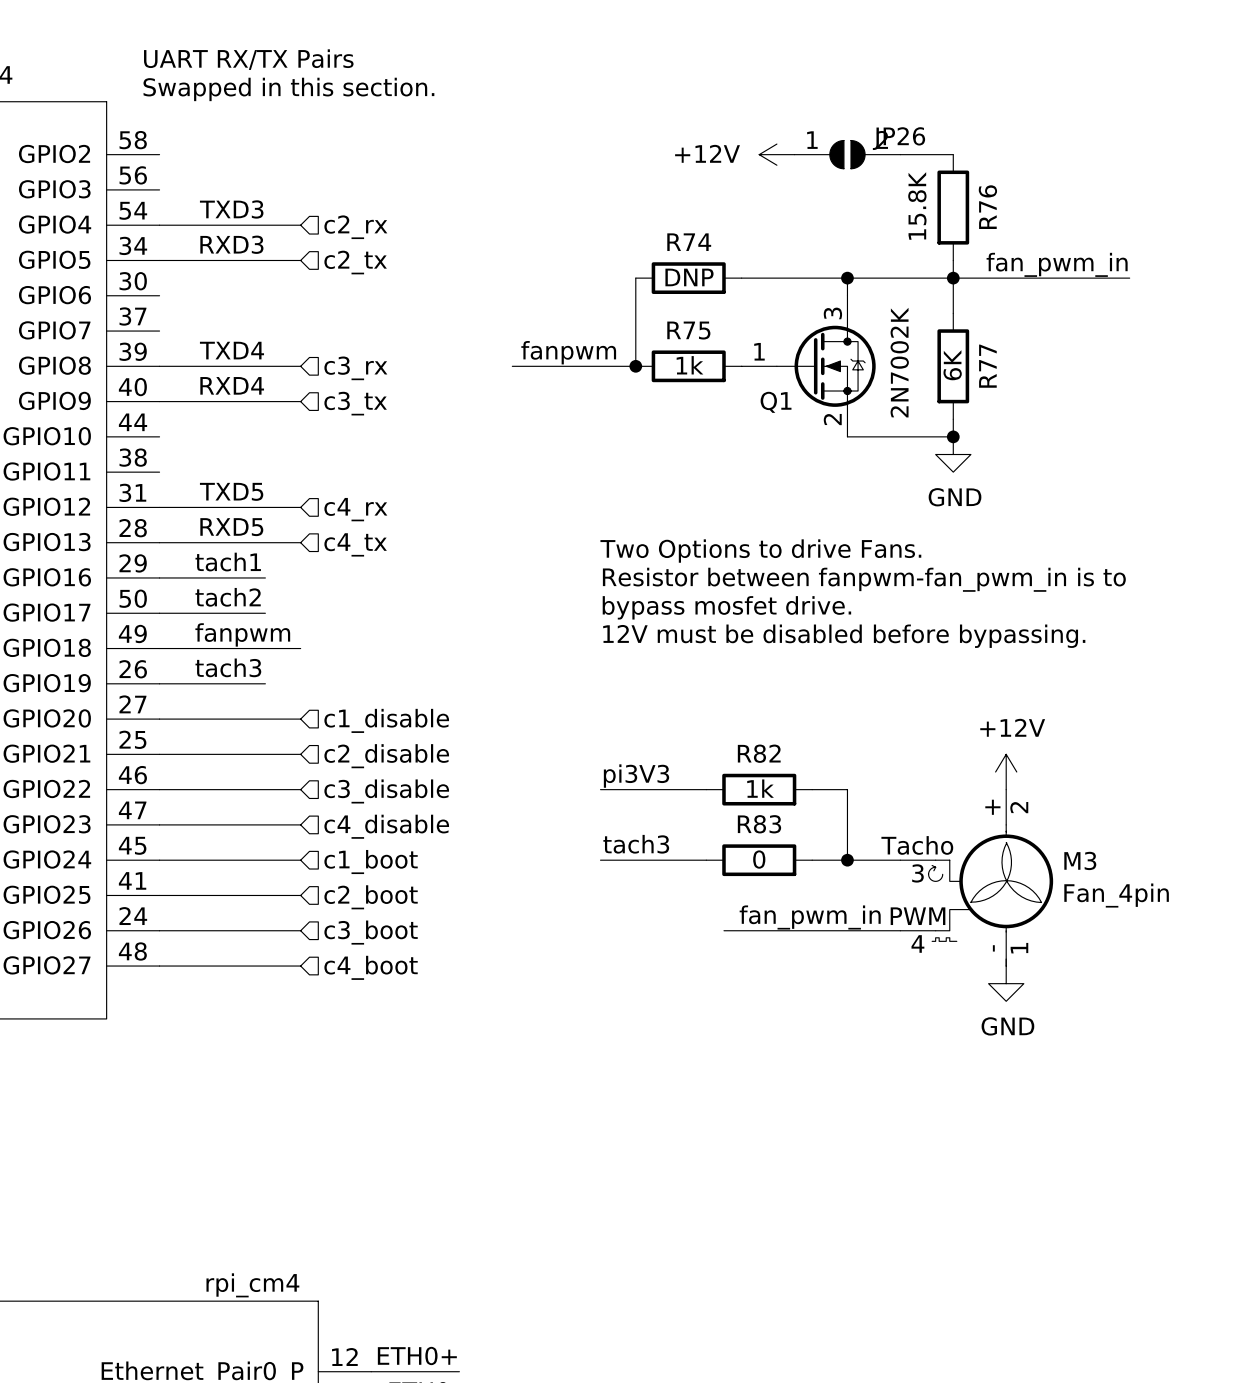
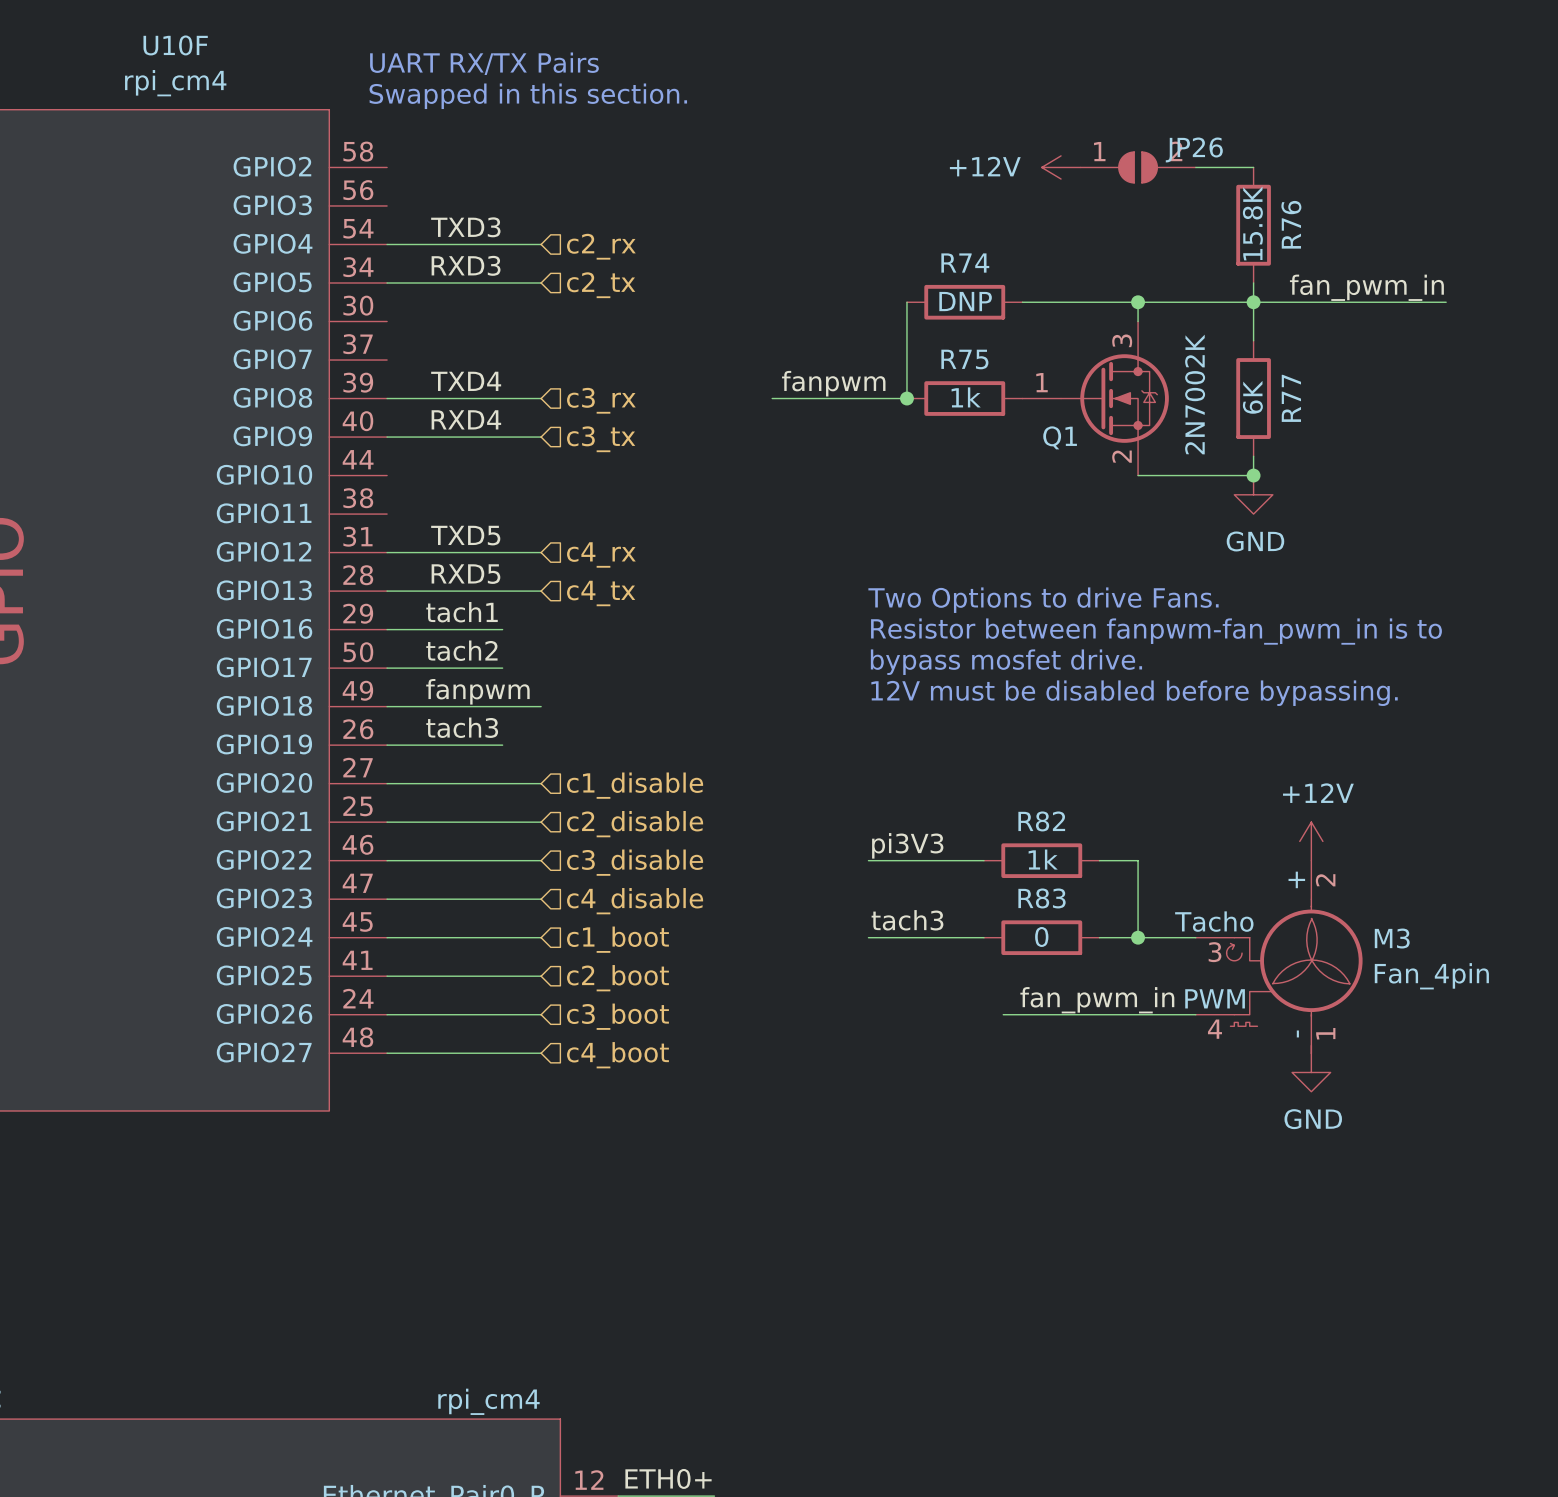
R76 value position: 15.8K (917, 205) -> 15.8K (1252, 223)

